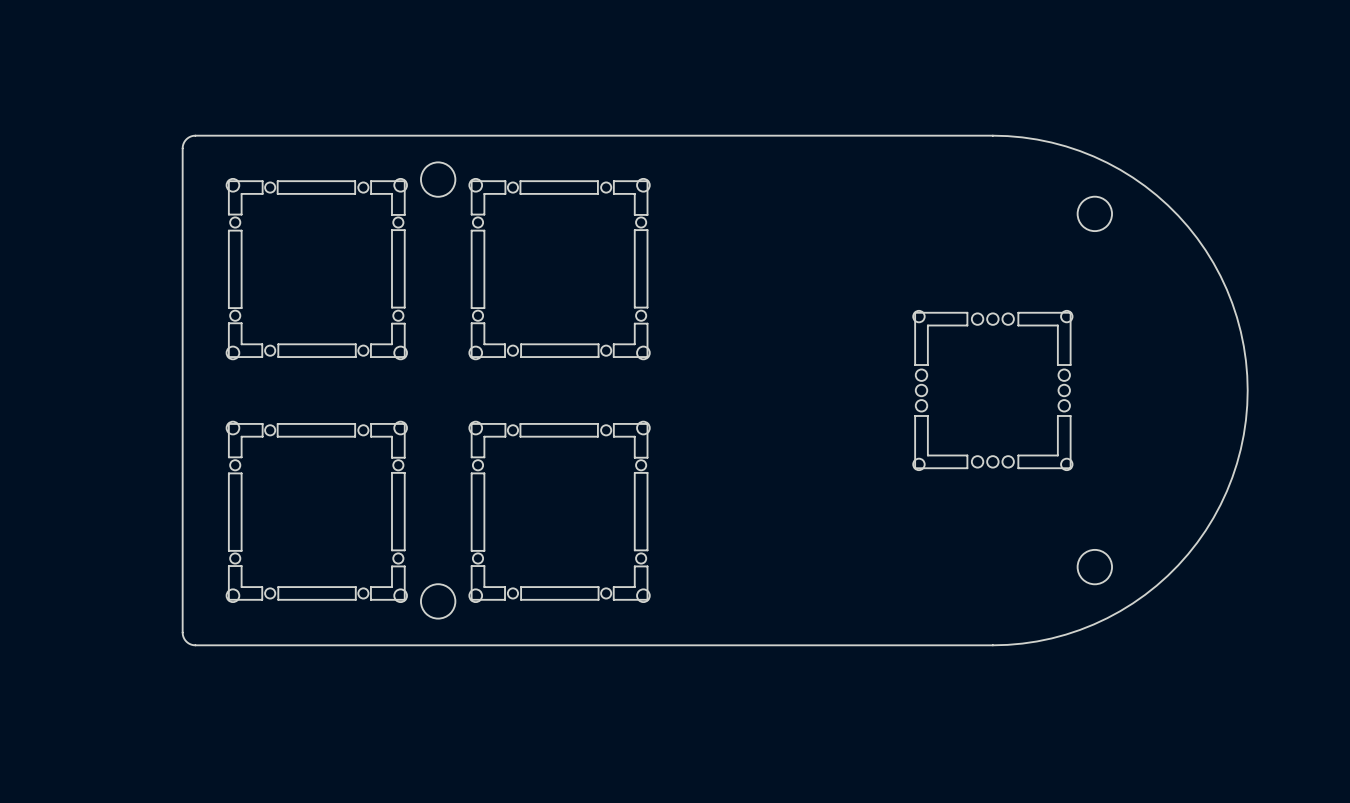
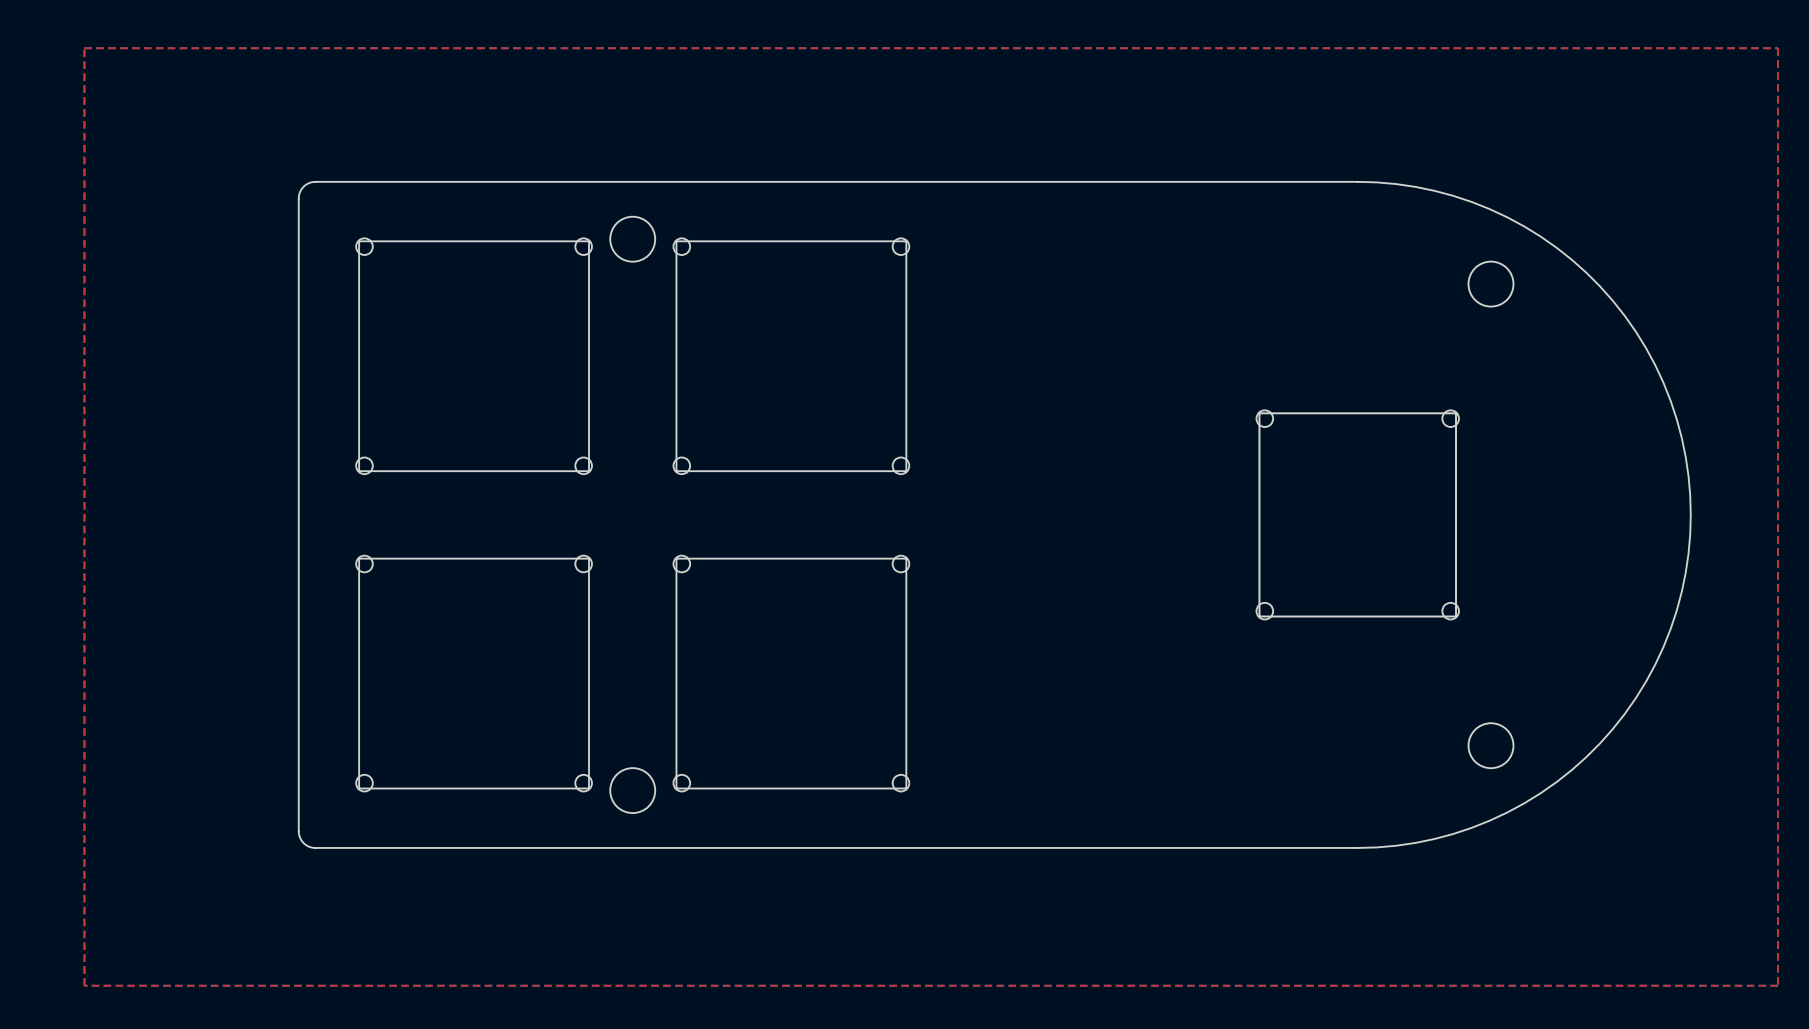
top zone outline: none -> (84, 48) (84, 985) (1778, 985) (1778, 48) (84, 48)
part footprint: [226, 178, 408, 360] -> [356, 238, 592, 475]
part footprint: [469, 178, 650, 360] -> [673, 238, 910, 475]
part footprint: [913, 310, 1073, 471] -> [1256, 410, 1459, 620]
part footprint: [226, 421, 408, 603] -> [356, 555, 592, 792]
part footprint: [469, 421, 650, 603] -> [673, 555, 910, 792]

